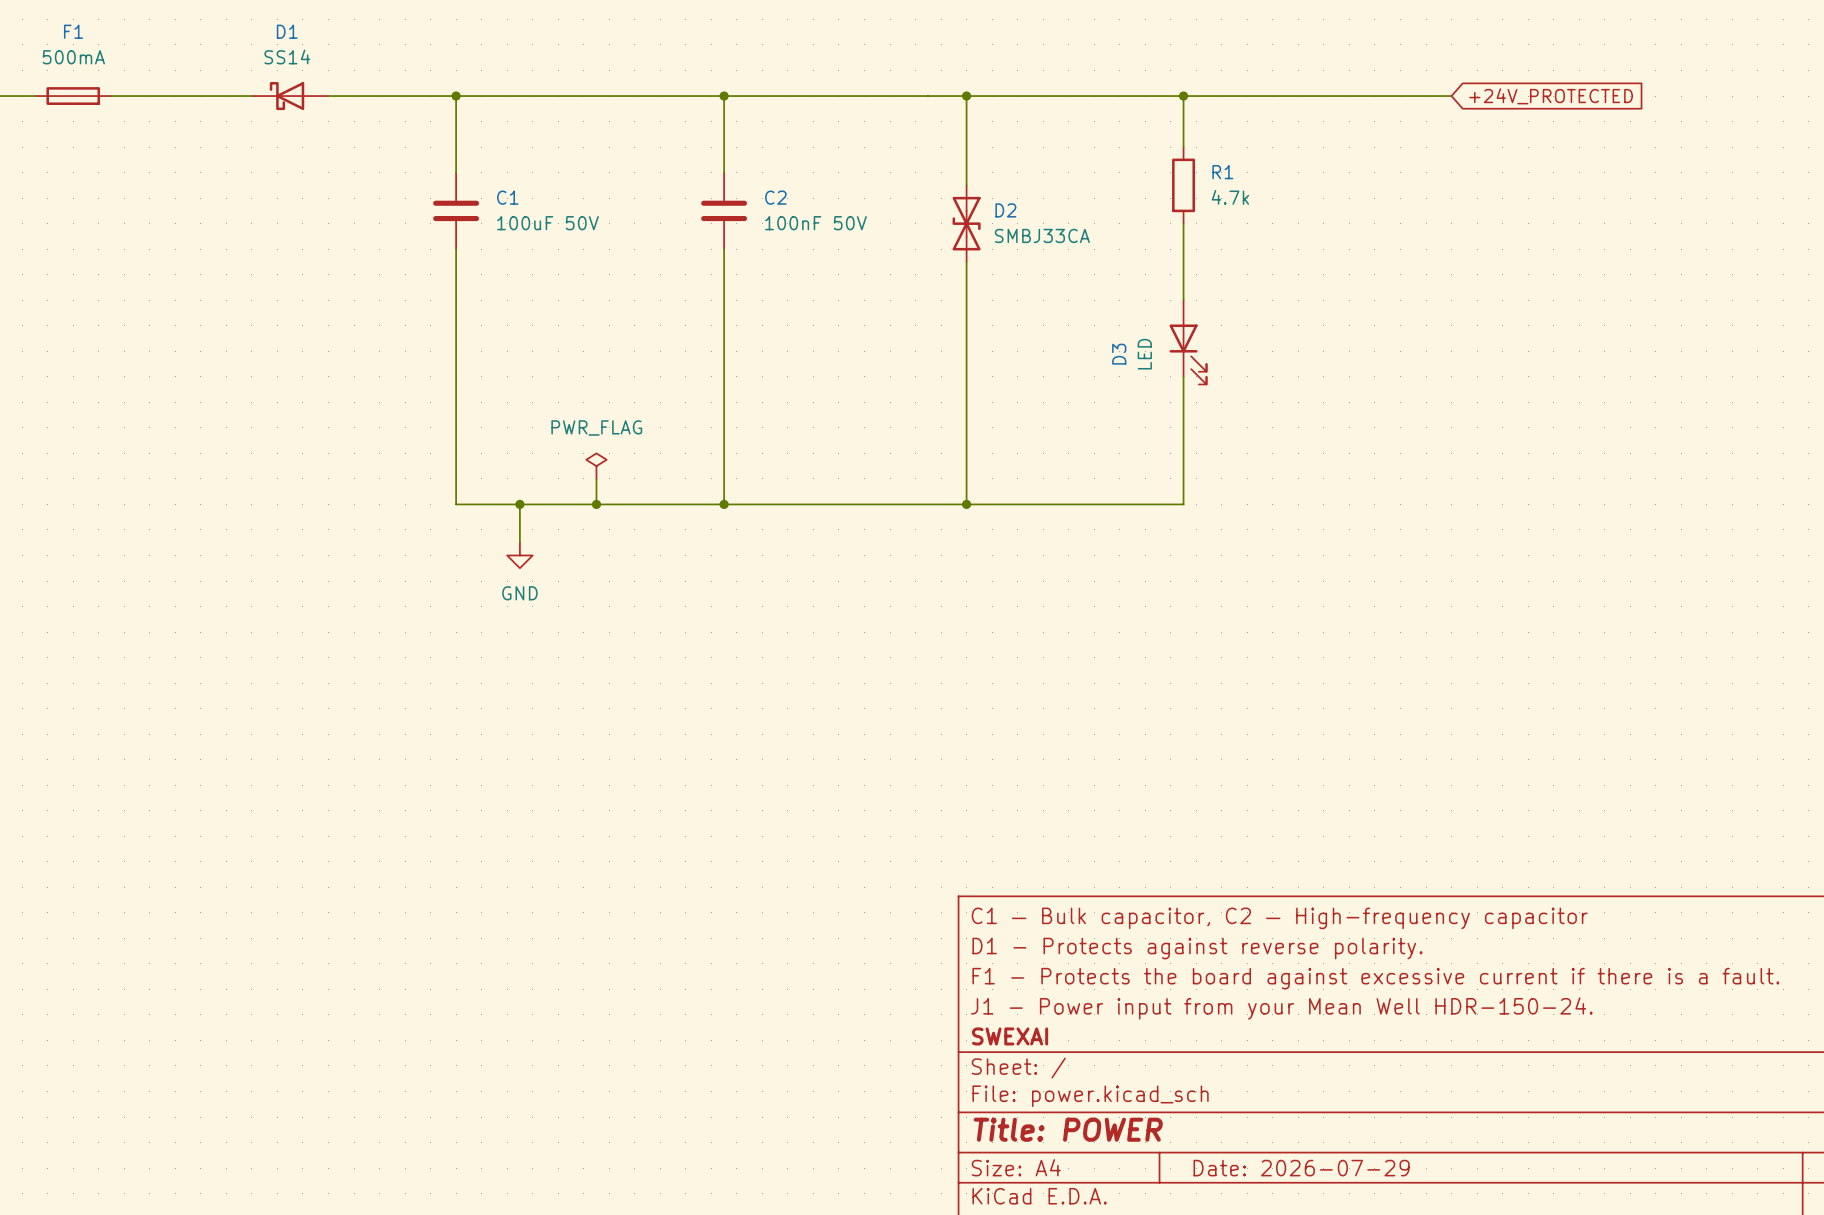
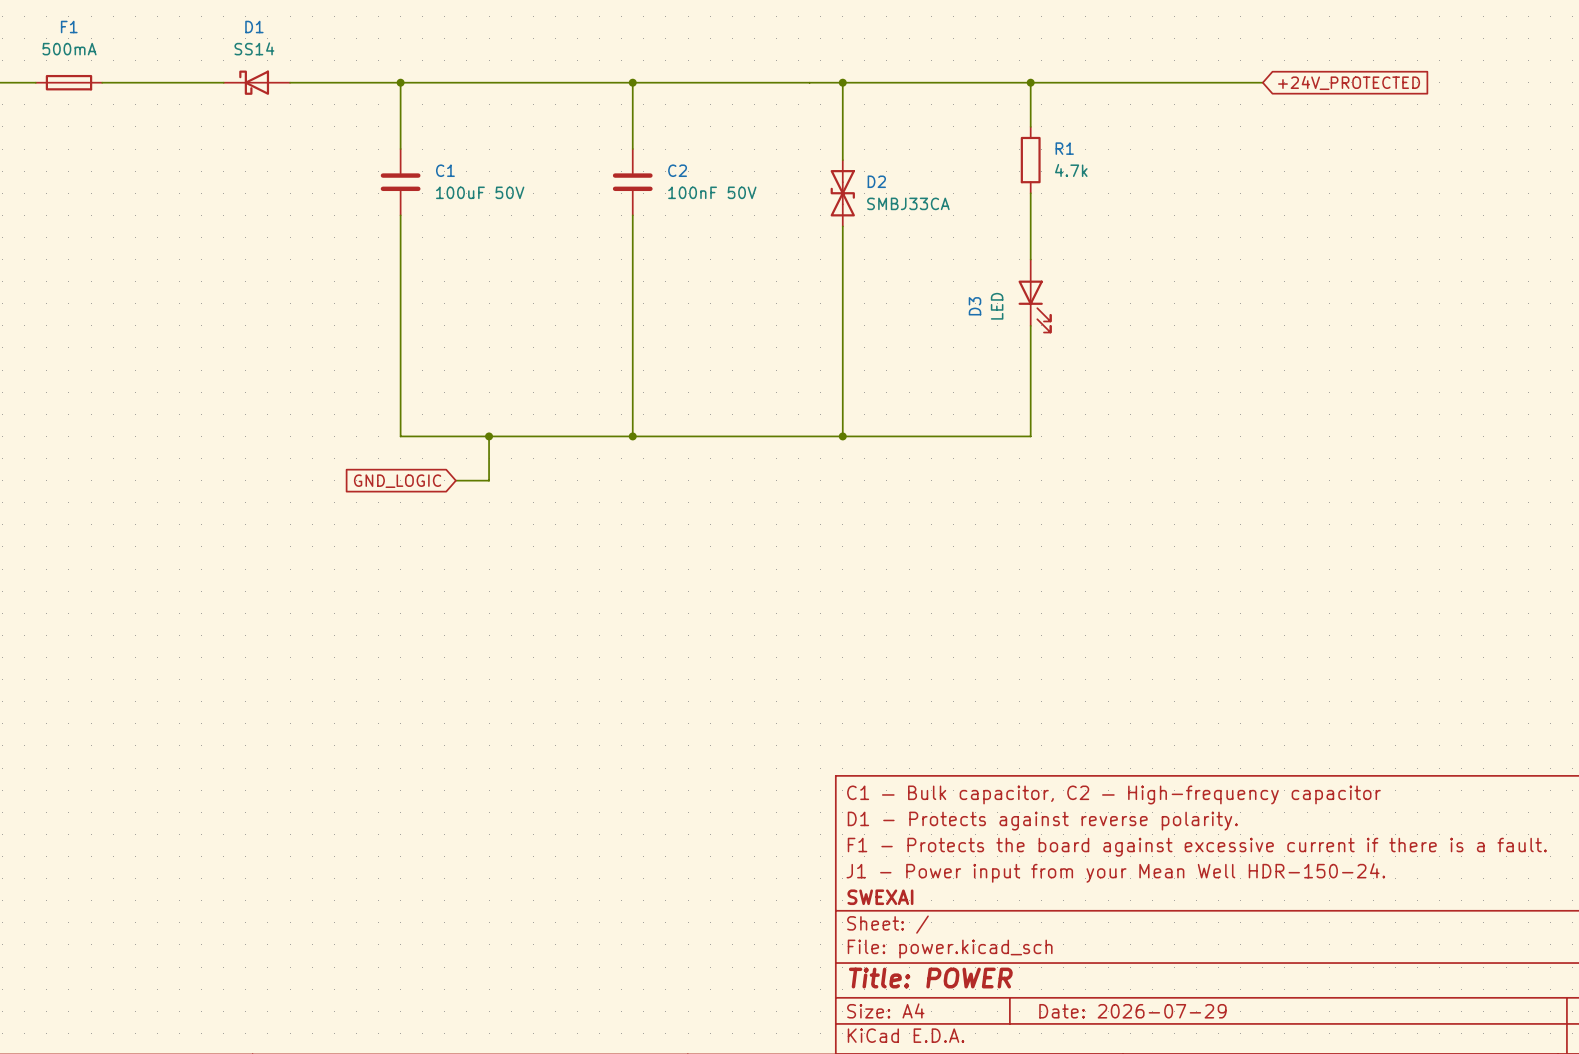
power symbol: PWR_FLAG (596, 466) -> none
wire: (596, 478) (596, 504) -> none
wire: (519, 504) (519, 542) -> none
junction: (519, 504) -> none
wire: none -> (489, 436) (489, 480) (455, 480)
junction: none -> (489, 436)
junction: (596, 504) -> none
power symbol: GND (519, 555) -> none
global label: none -> GND_LOGIC (397, 481)

